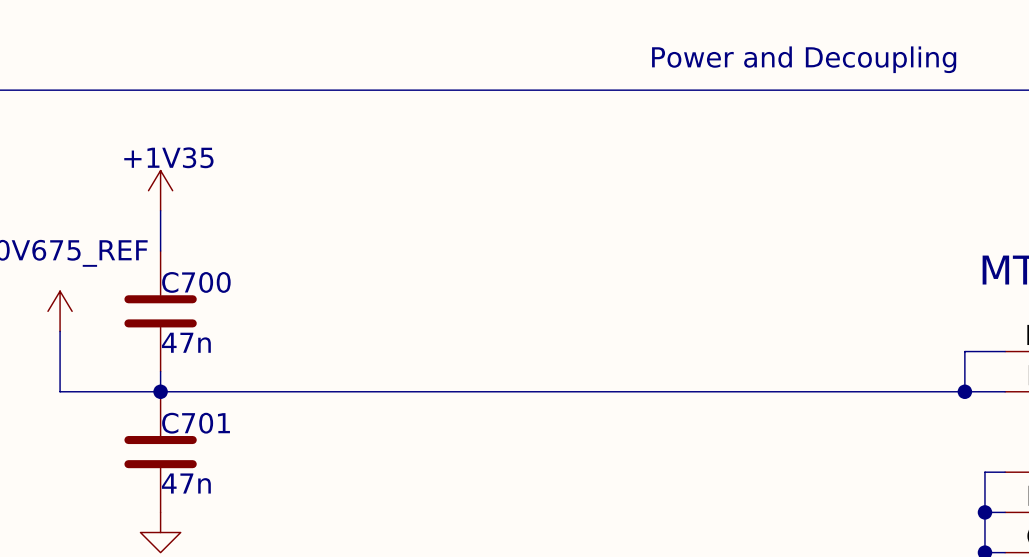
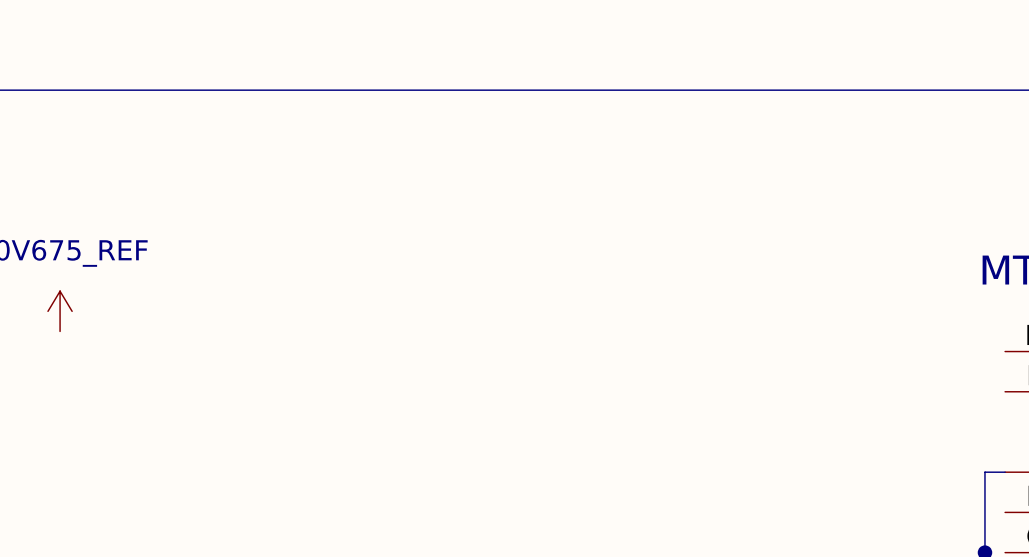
text: Power and Decoupling (804, 59) -> none
power symbol: +1V35 (160, 190) -> none
wire: (160, 210) (160, 251) -> none
C700: 47n (160, 311) -> none
wire: (60, 331) (60, 391) (1005, 391) -> none
wire: (1005, 351) (964, 351) (964, 391) -> none
wire: (160, 371) (160, 391) -> none
junction: (160, 391) -> none
junction: (964, 391) -> none
C701: 47n (160, 452) -> none
wire: (984, 512) (1005, 512) -> none
junction: (984, 512) -> none
power symbol: (160, 532) -> none
wire: (984, 552) (1005, 552) -> none

